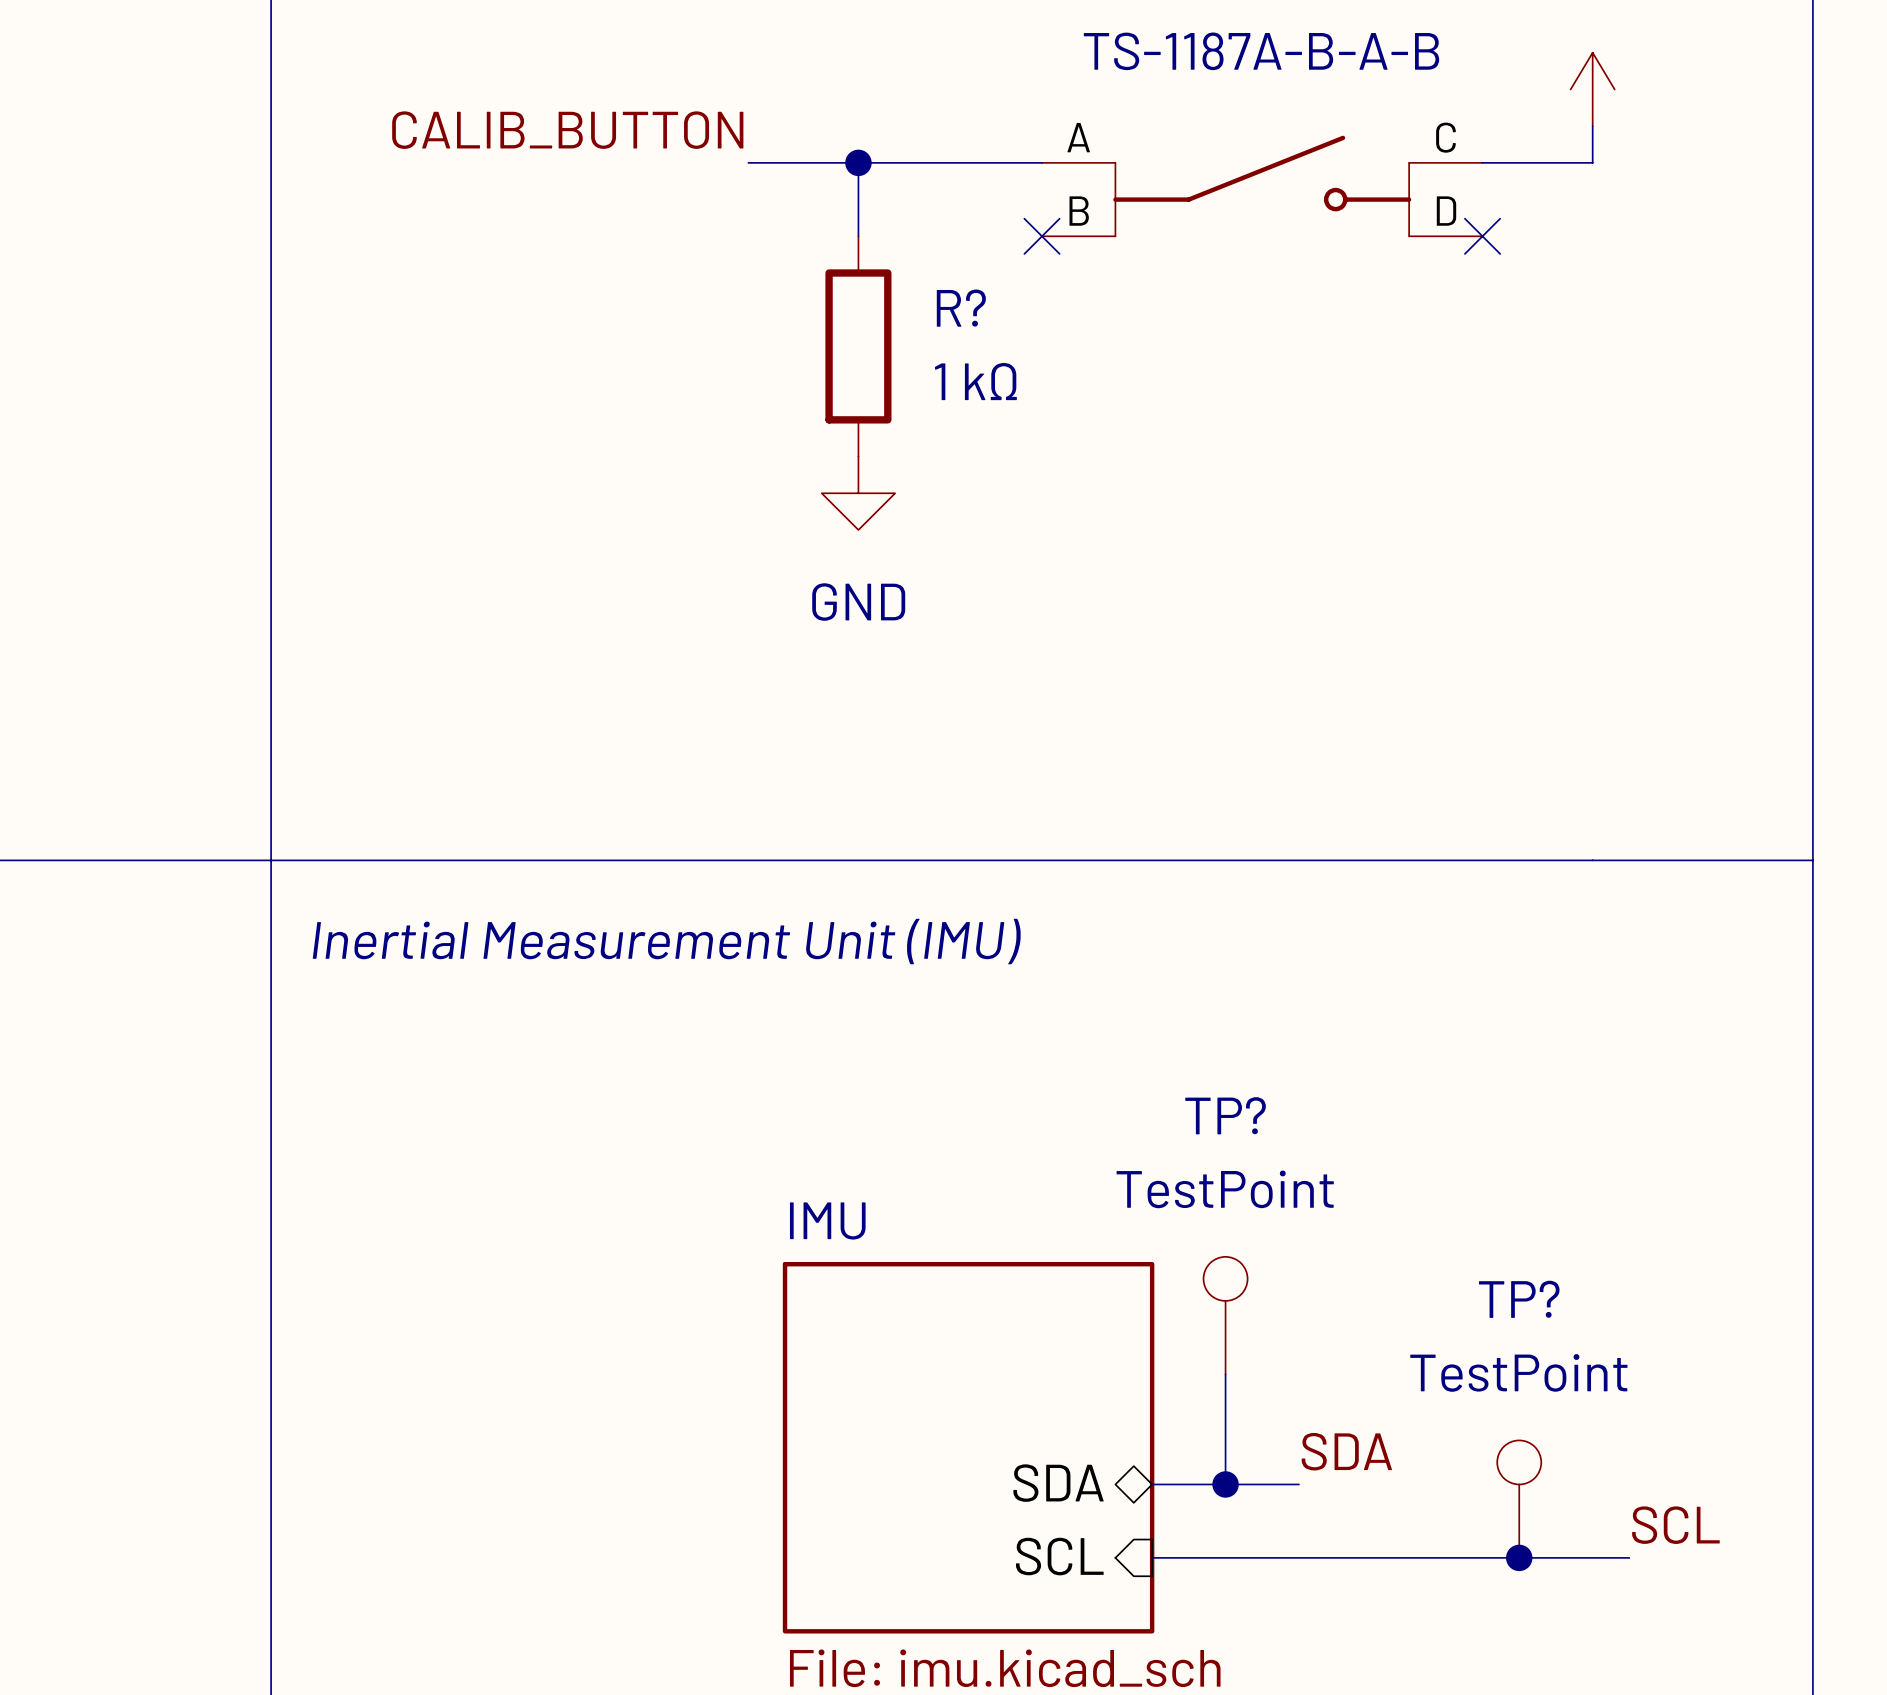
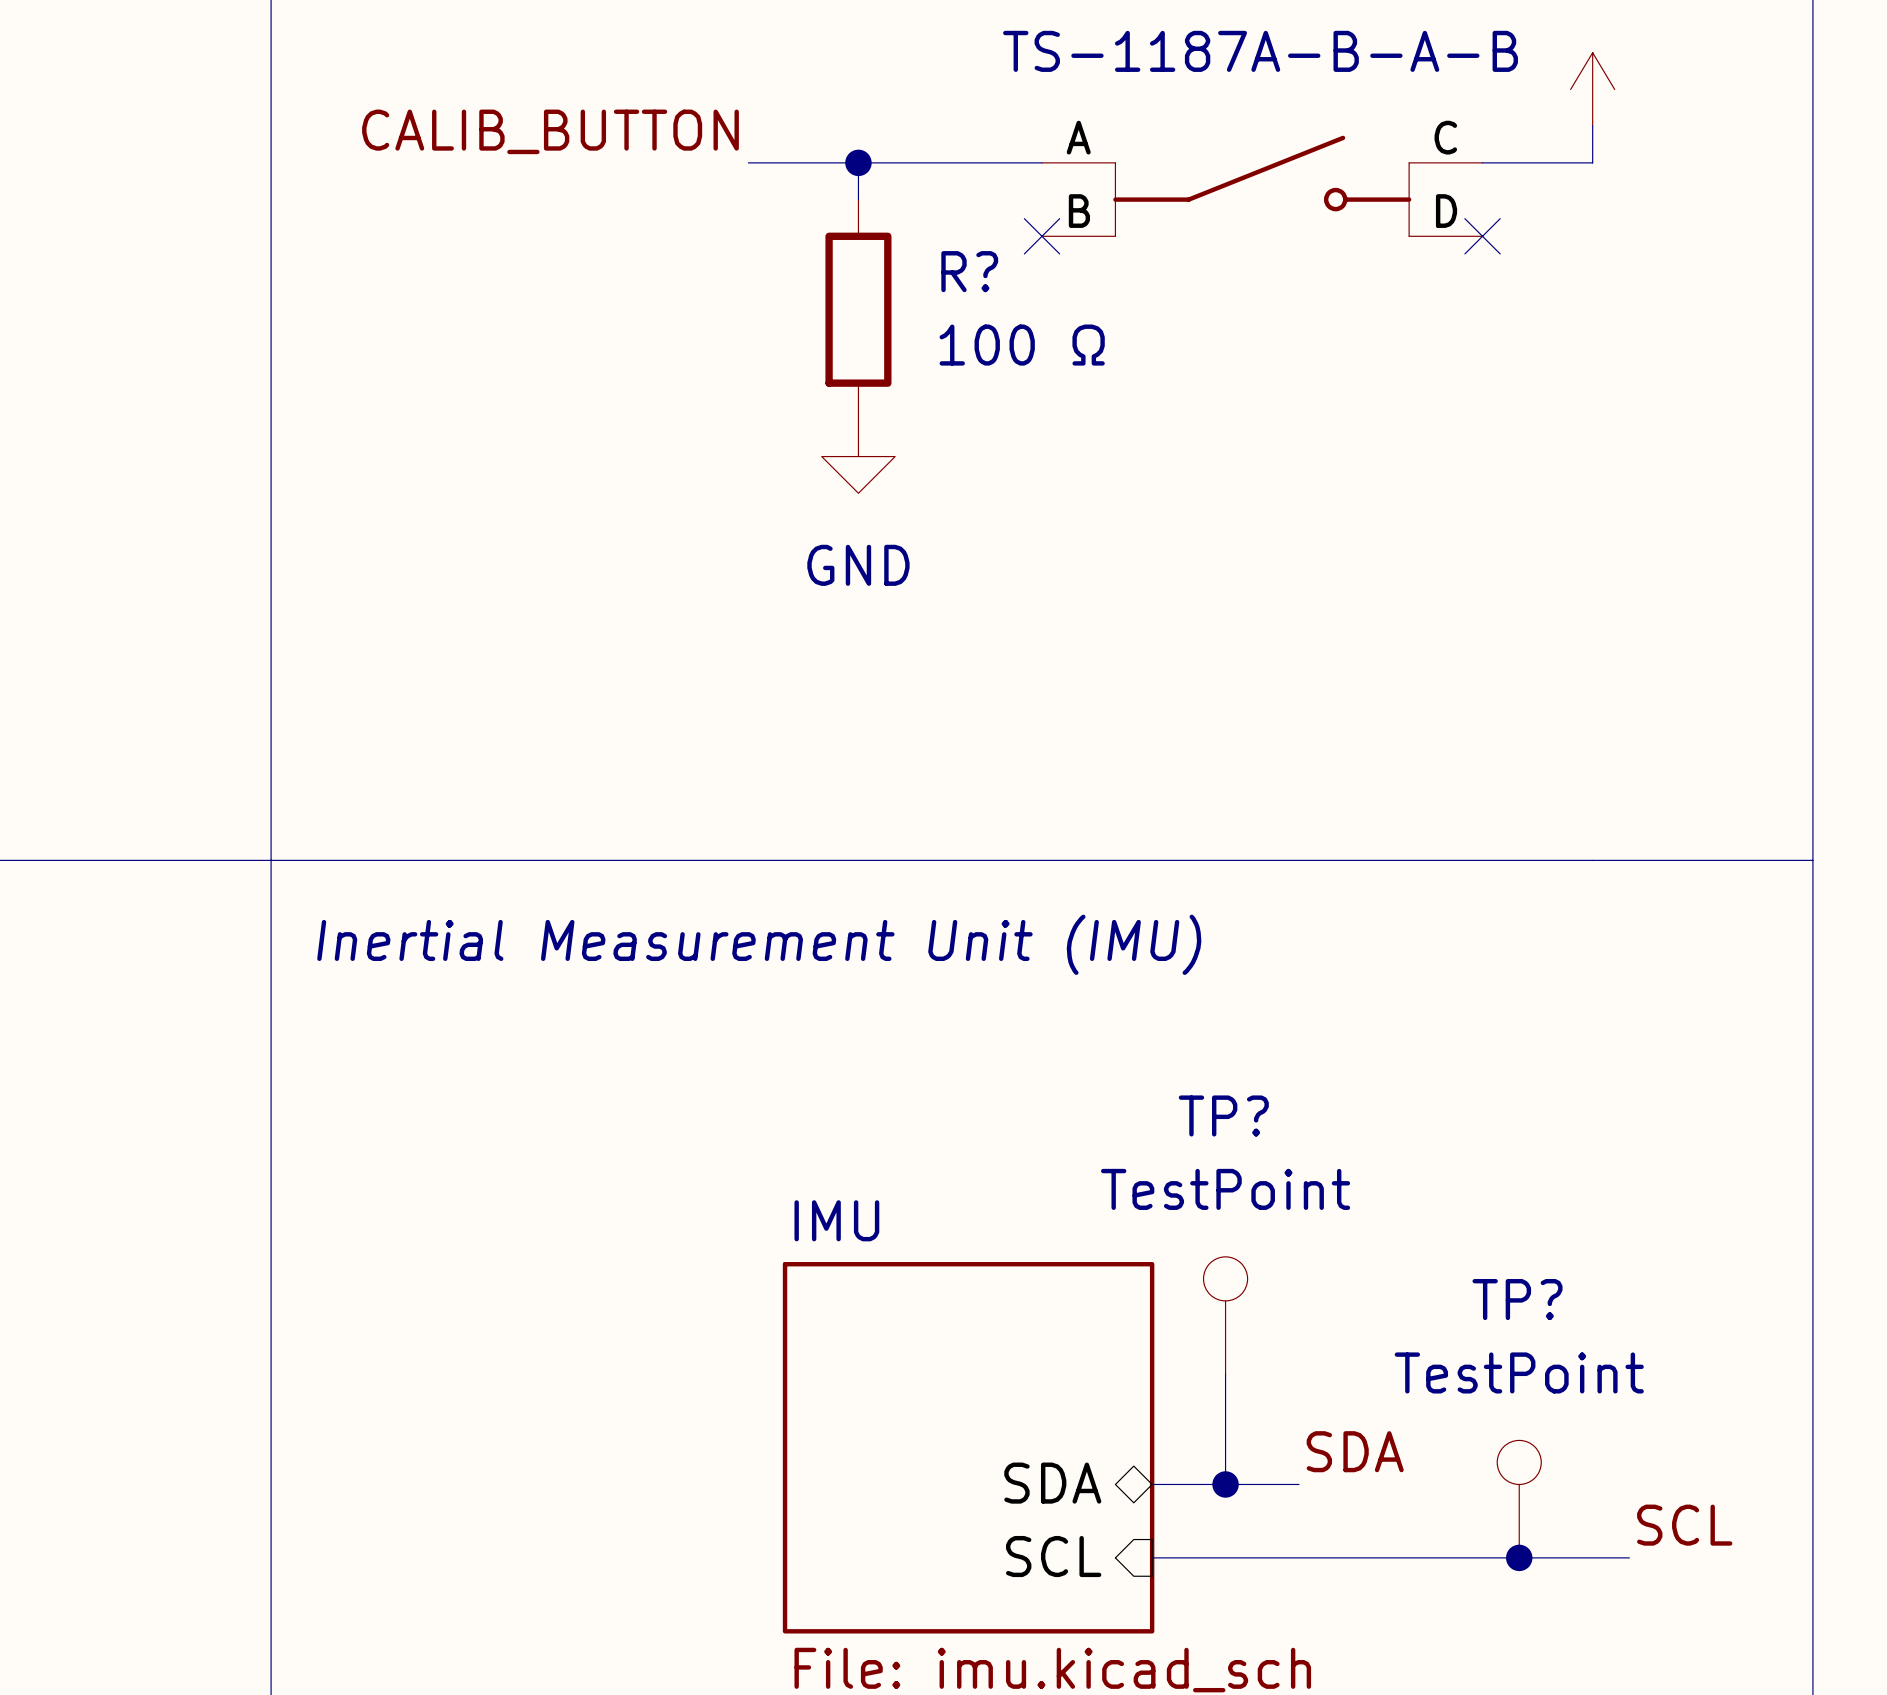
R?: none -> 100 Ω (858, 309)
R?: 1 kΩ (858, 346) -> none
power symbol position: GND (858, 493) -> GND (858, 456)

